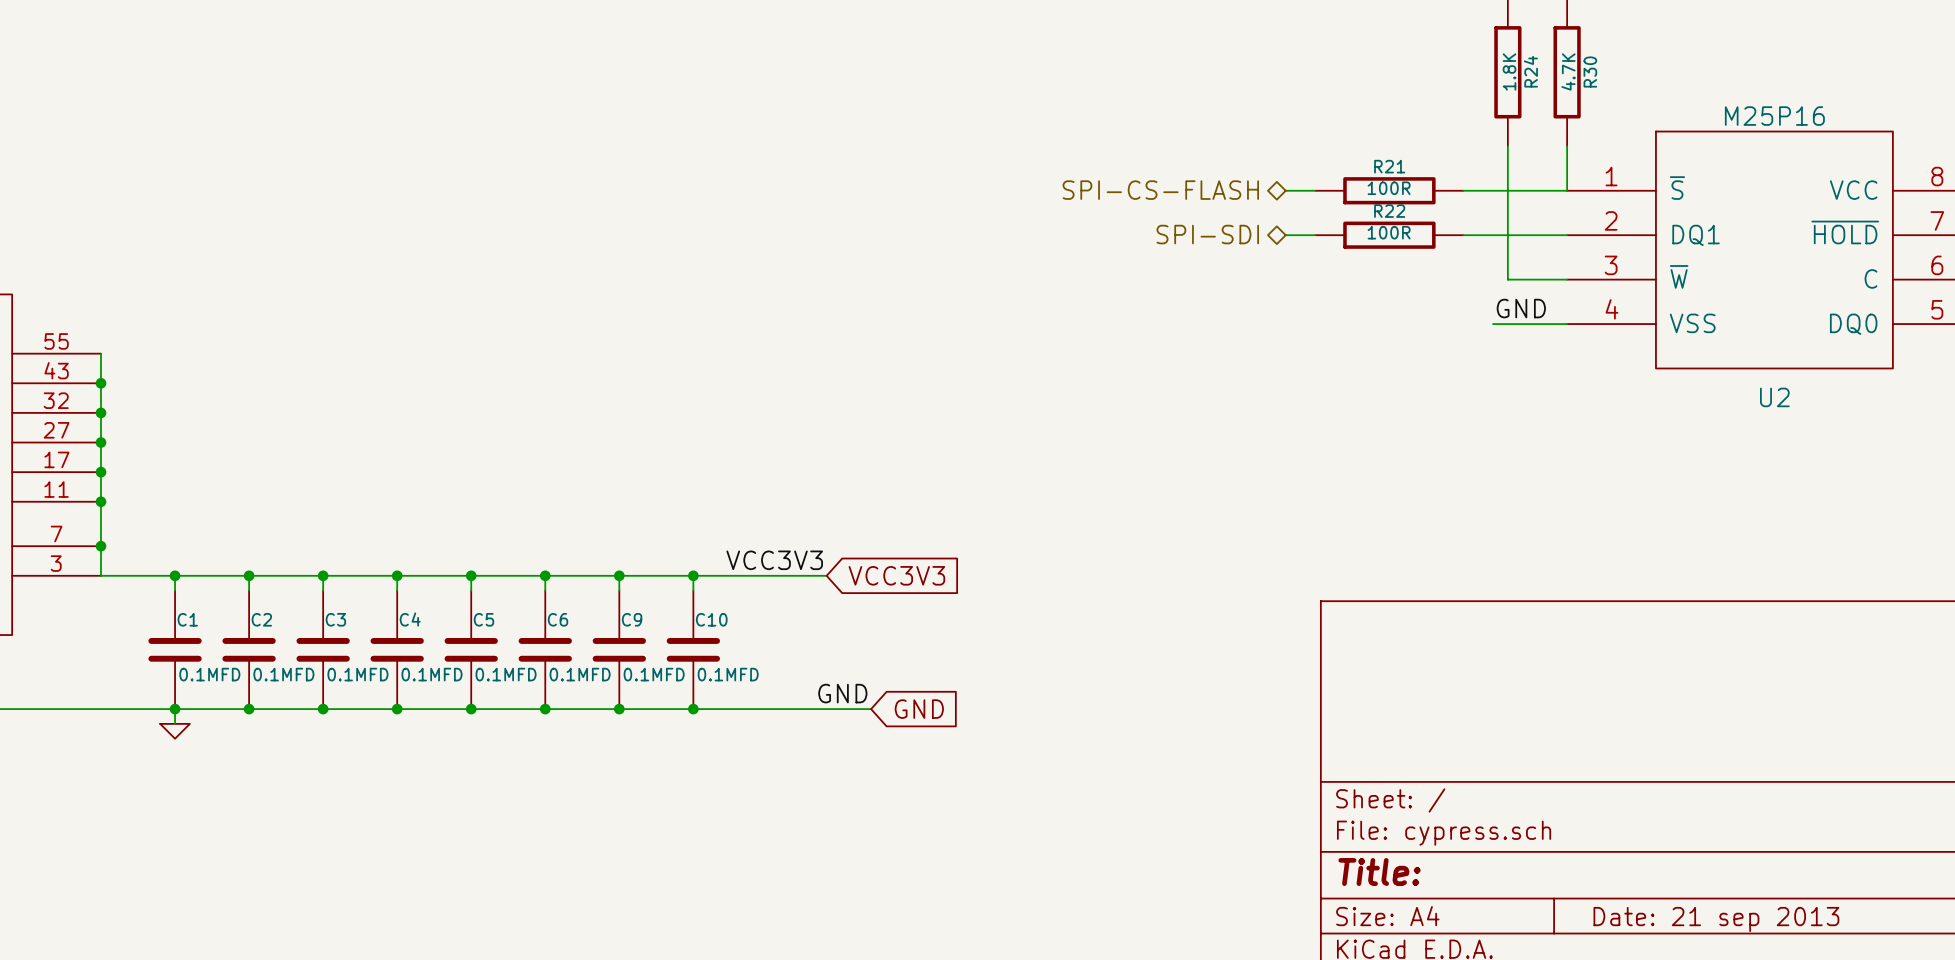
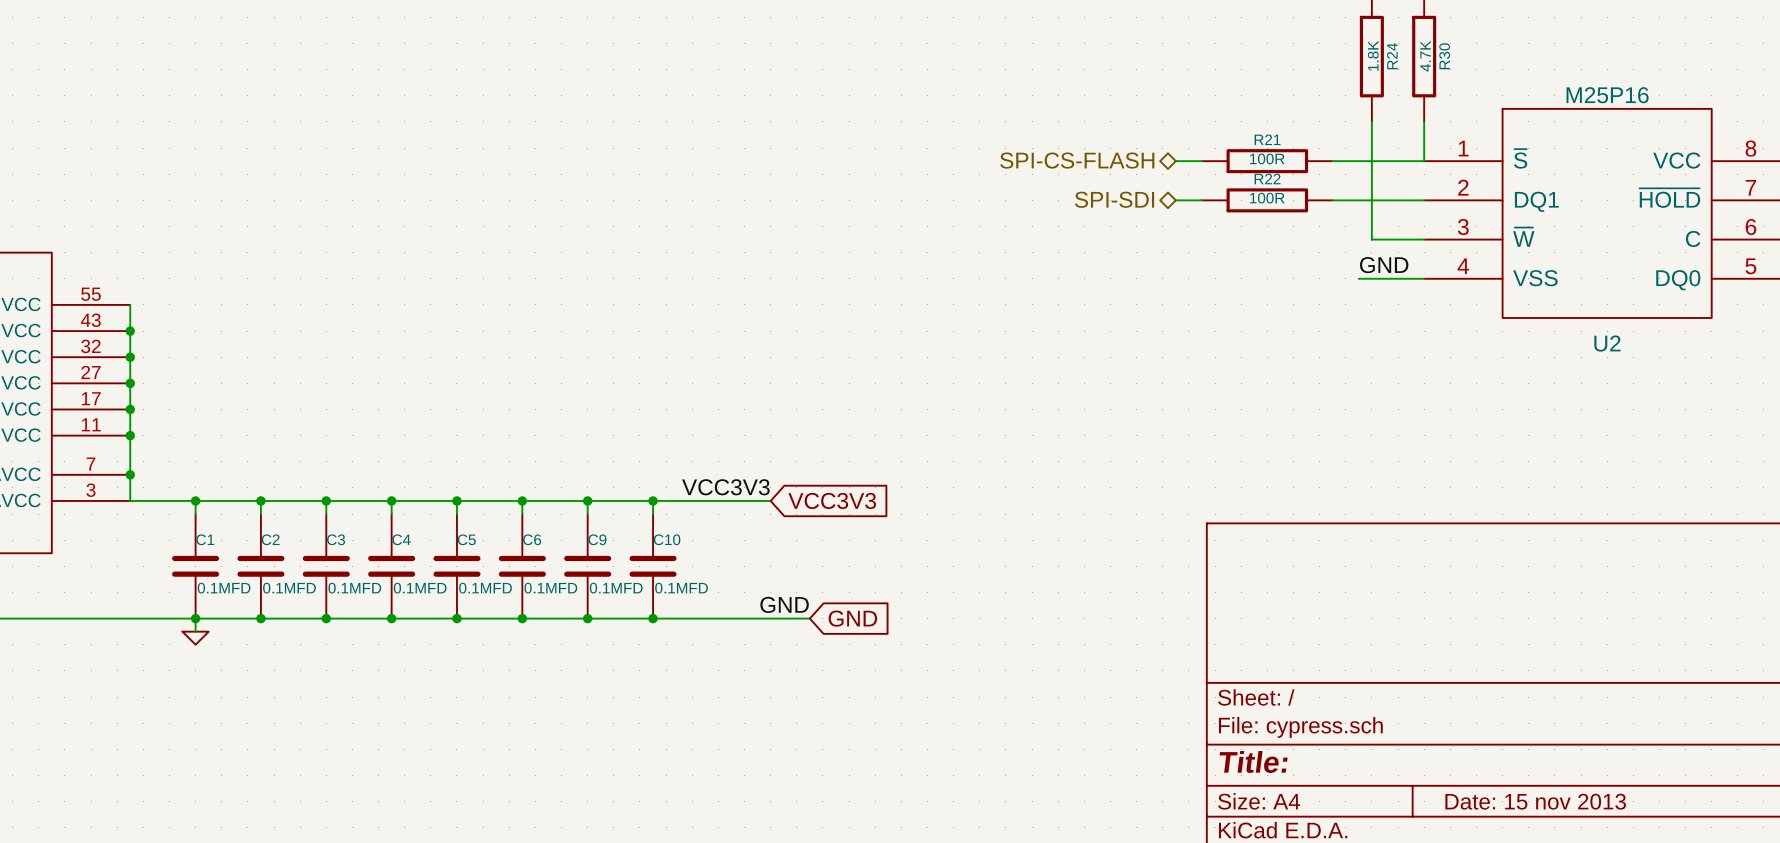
title block: Date: 21 sep 2013 (1716, 919) -> Date: 15 nov 2013 (1535, 801)

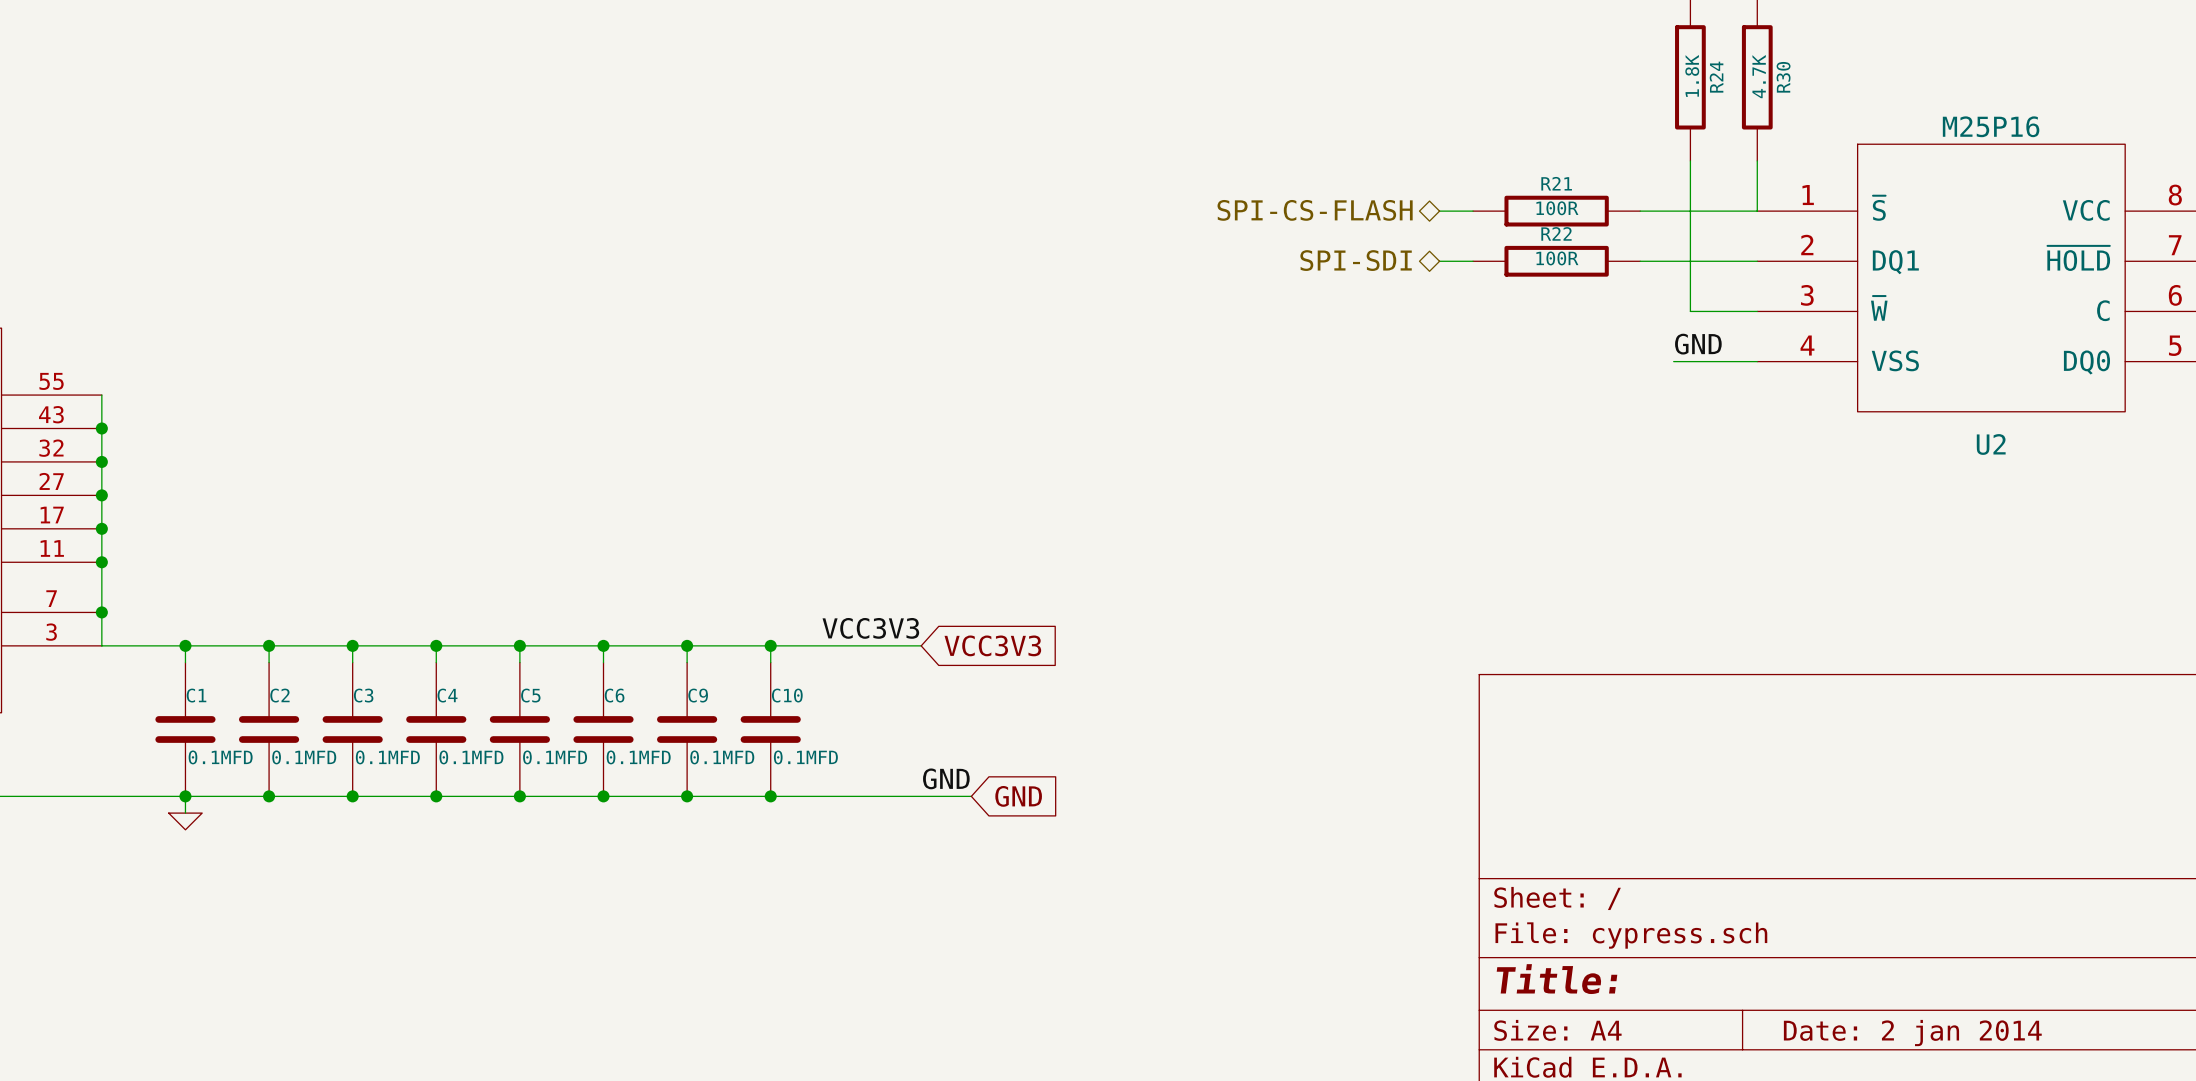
title block: Date: 15 nov 2013 (1535, 801) -> Date: 2 jan 2014 (1912, 1033)

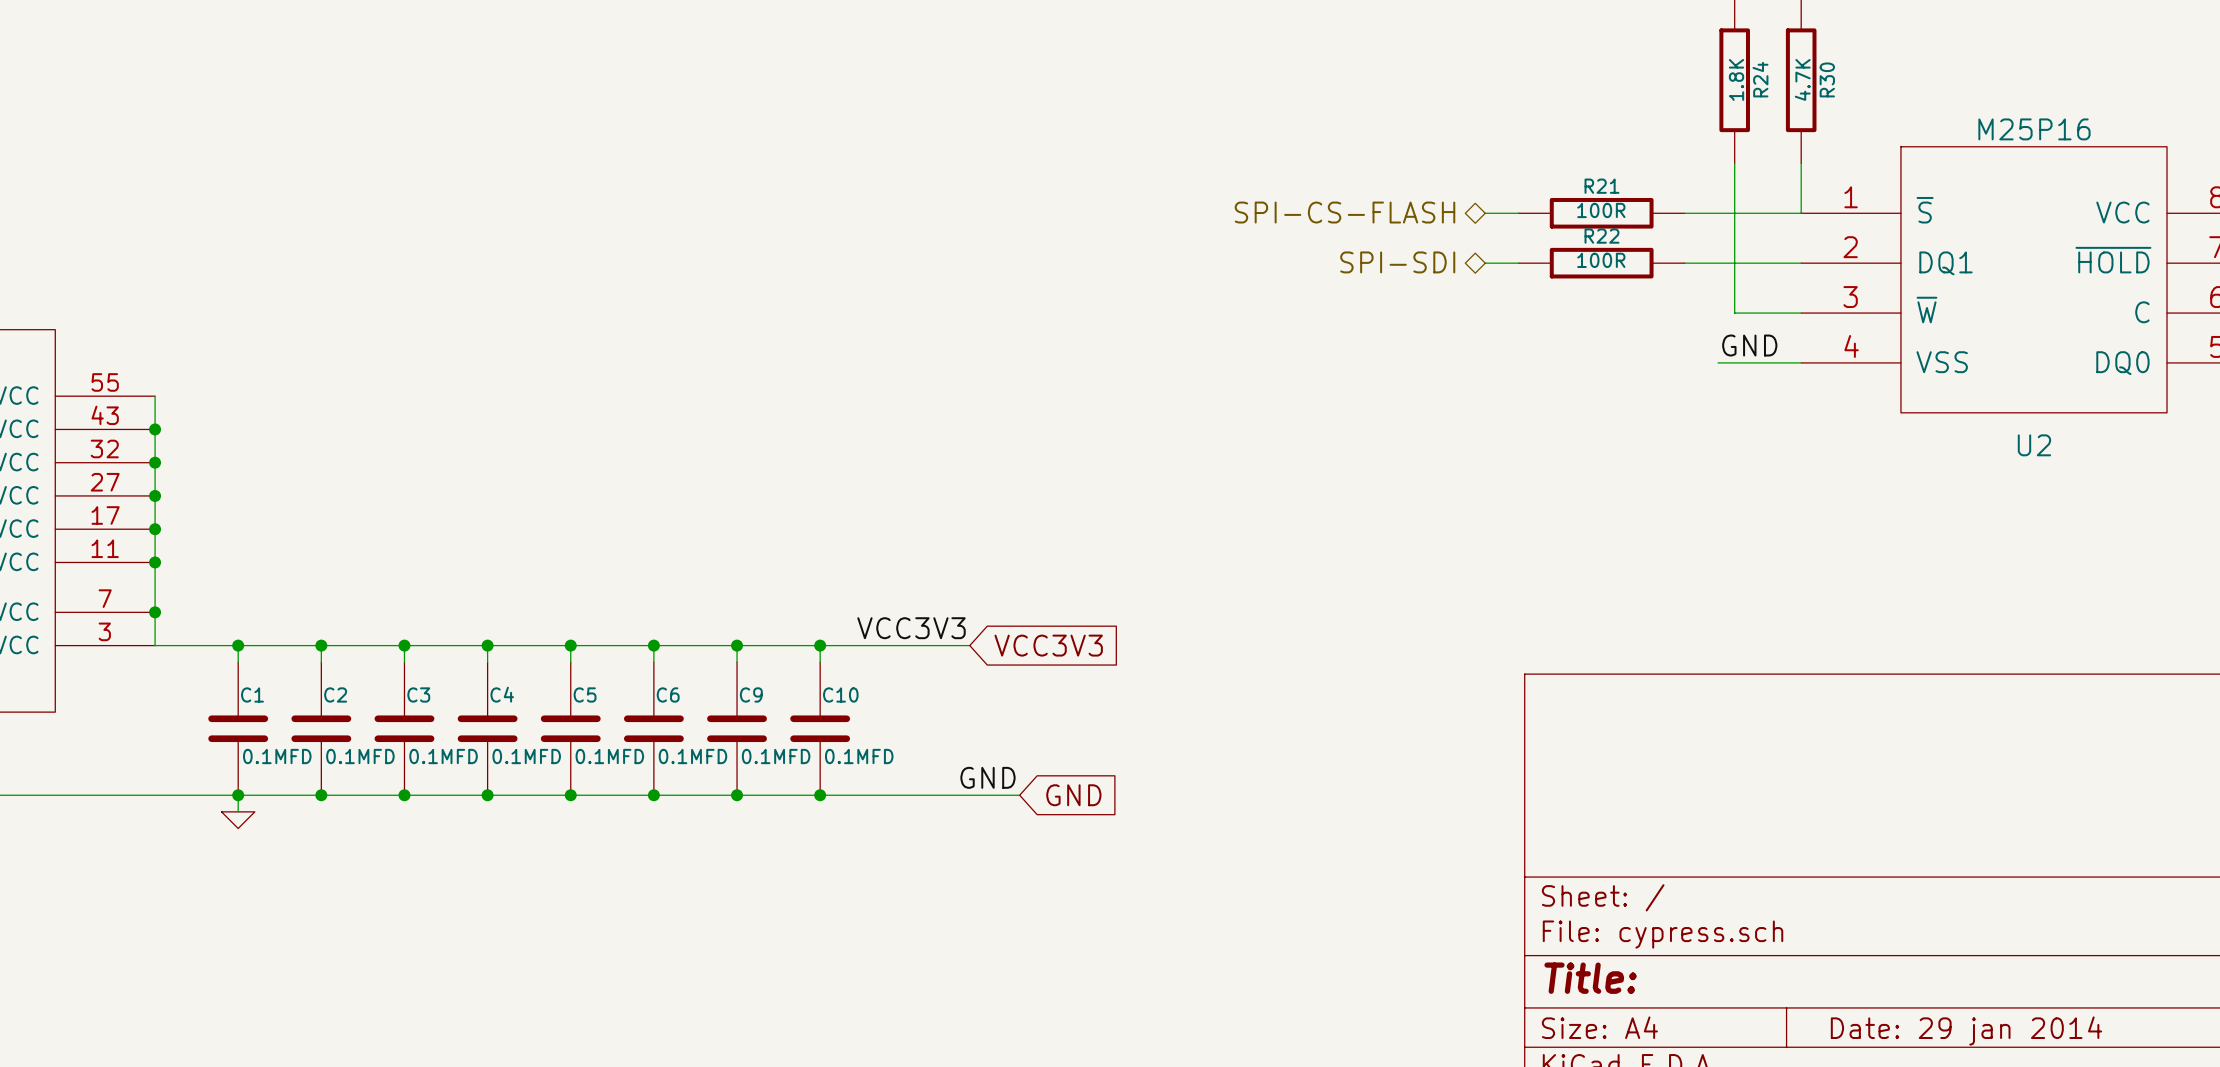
title block: Date: 2 jan 2014 (1912, 1033) -> Date: 29 jan 2014 (1966, 1030)

